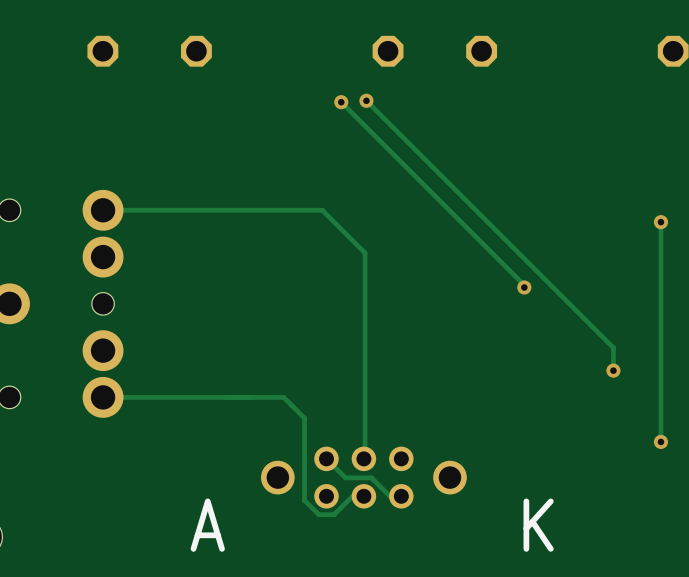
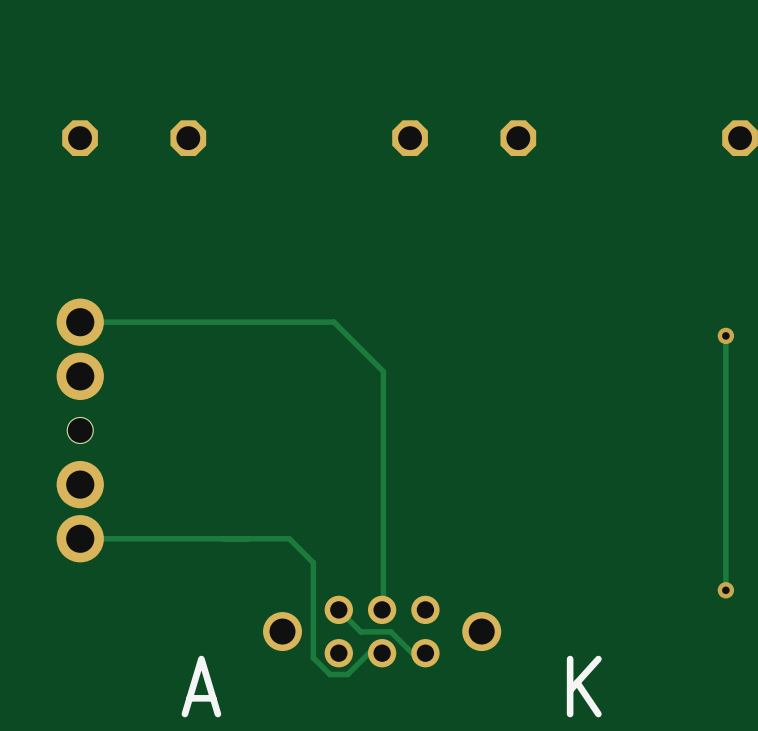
track: (366, 100) (613, 347) (613, 370) -> none
via: (366, 100) -> none
track: (341, 102) (524, 285) (524, 287) -> none
via: (341, 102) -> none
via: (524, 287) -> none
via: (613, 370) -> none

